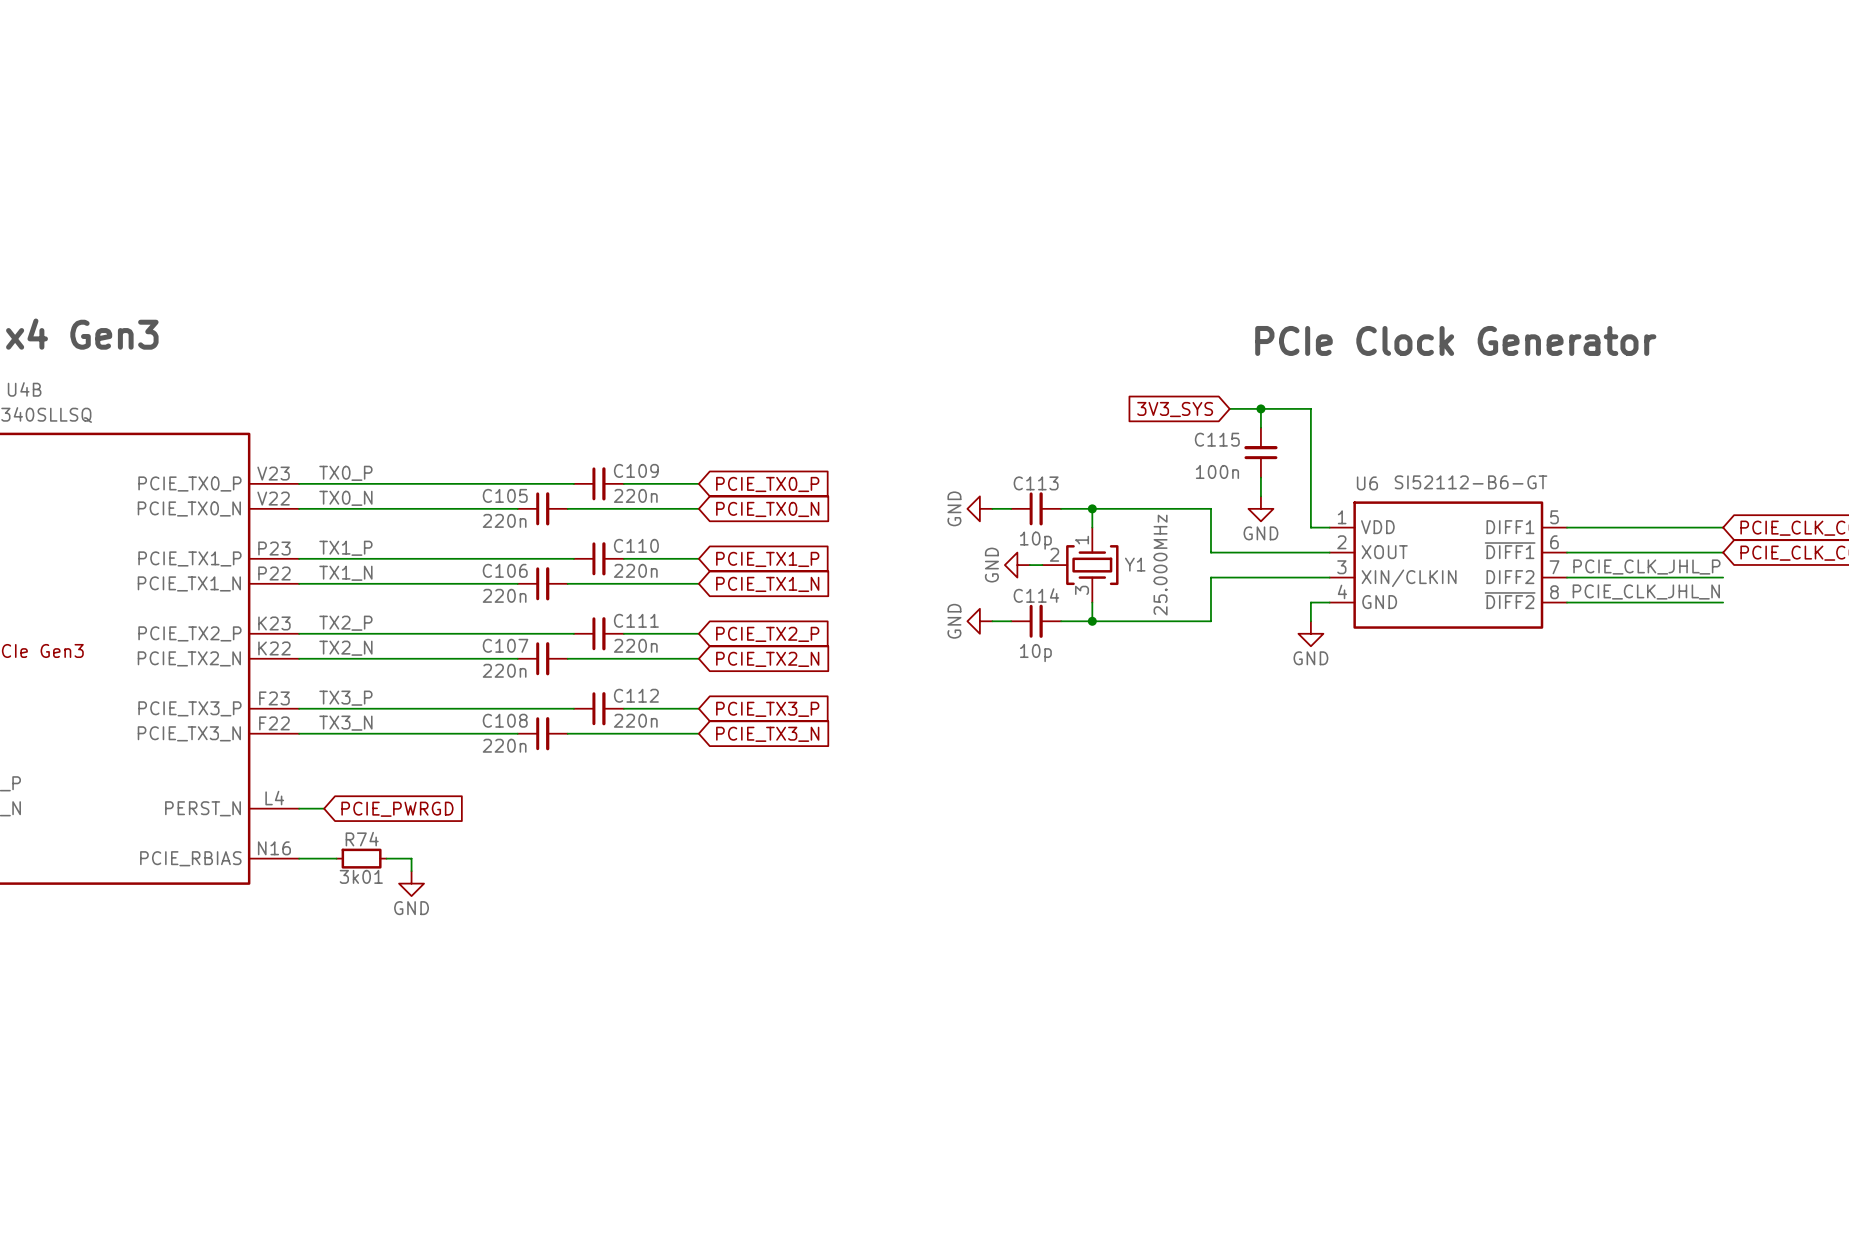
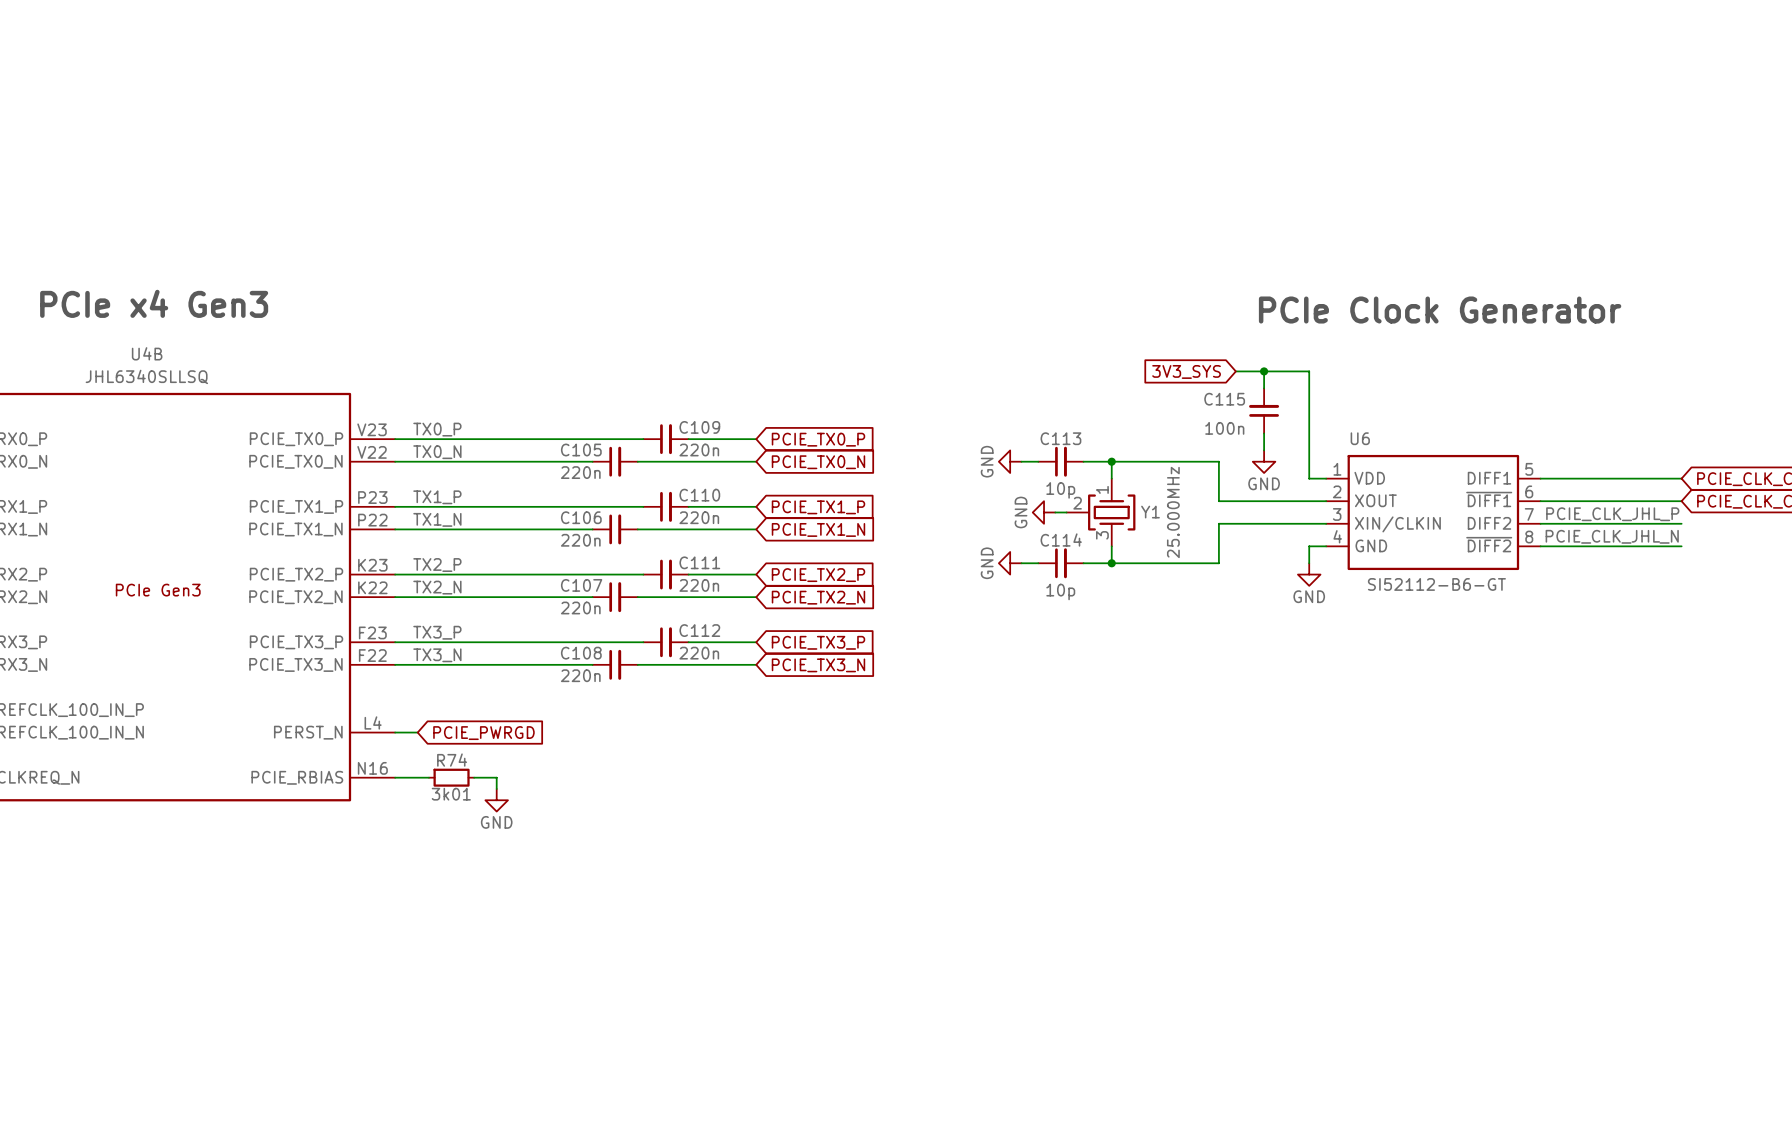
U6 value position: SI52112-B6-GT (1471, 482) -> SI52112-B6-GT (1436, 584)

